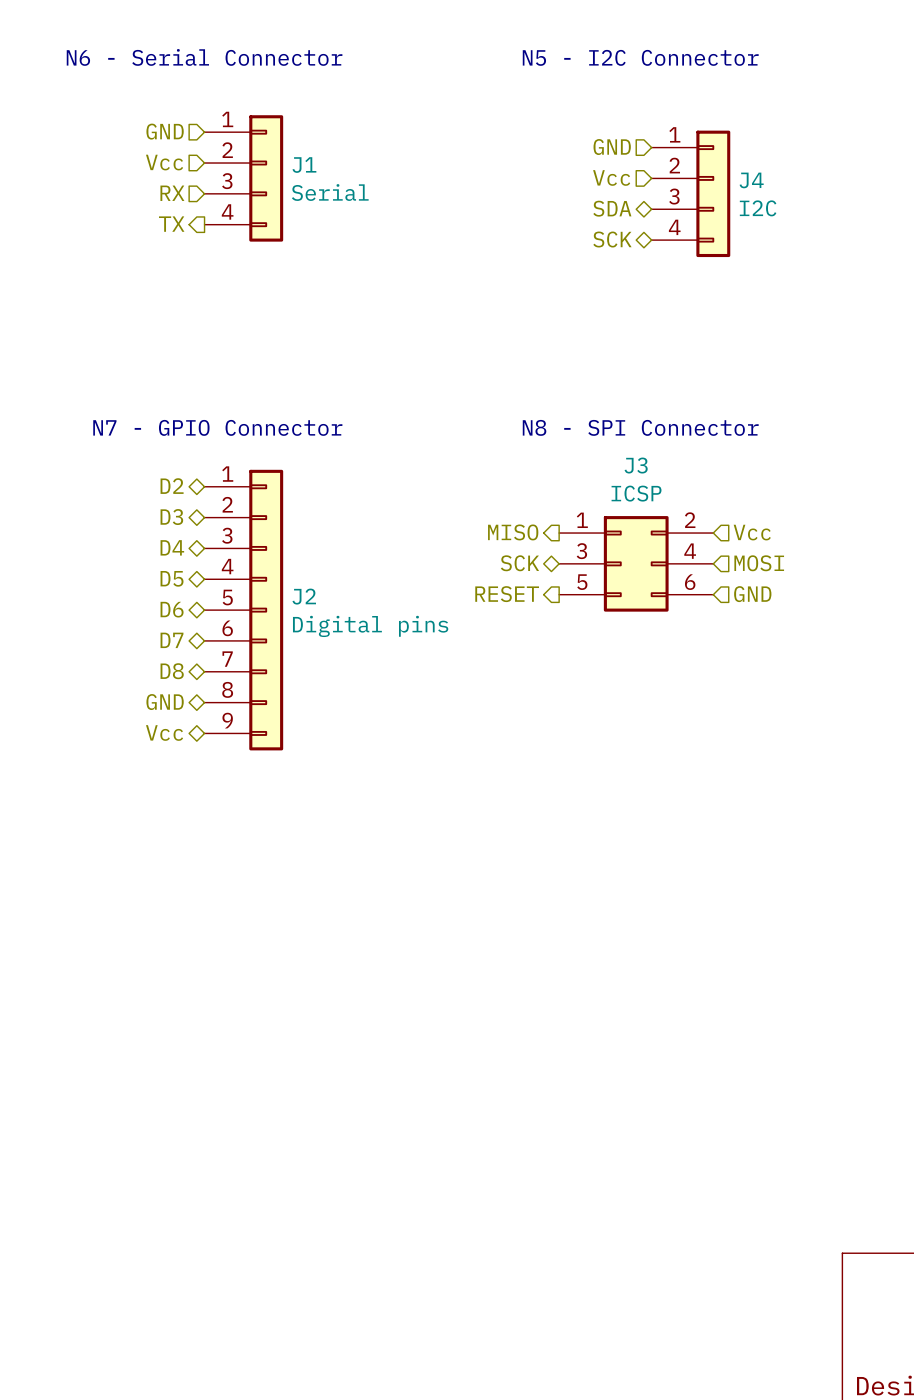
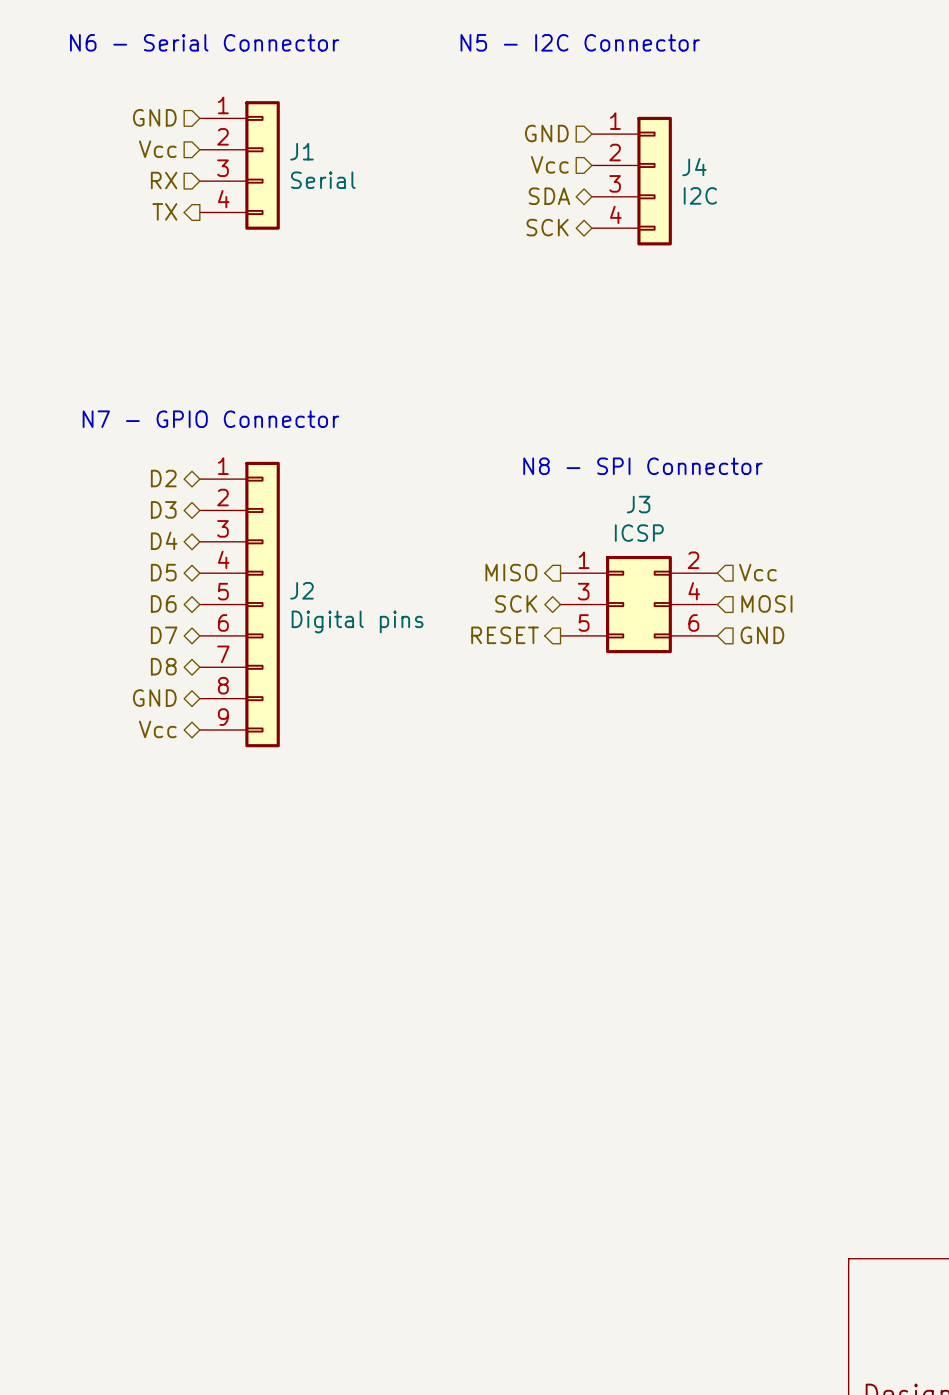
text position: N5 - I2C Connector (640, 57) -> N5 - I2C Connector (580, 42)
hierarchical label position: GND (612, 147) -> GND (546, 133)
hierarchical label position: Vcc (611, 177) -> Vcc (549, 164)
J4 position: (690, 193) -> (631, 181)
hierarchical label position: SDA (612, 208) -> SDA (549, 196)
hierarchical label position: SCK (612, 239) -> SCK (547, 227)
text position: N8 - SPI Connector (640, 427) -> N8 - SPI Connector (642, 466)
hierarchical label position: MISO (513, 532) -> MISO (511, 572)
hierarchical label position: Vcc (752, 532) -> Vcc (757, 572)
hierarchical label position: SCK (519, 563) -> SCK (516, 603)
J3 position: (636, 563) -> (638, 604)
hierarchical label position: MOSI (759, 563) -> MOSI (766, 603)
hierarchical label position: RESET (507, 594) -> RESET (505, 635)
hierarchical label position: GND (752, 594) -> GND (762, 635)

